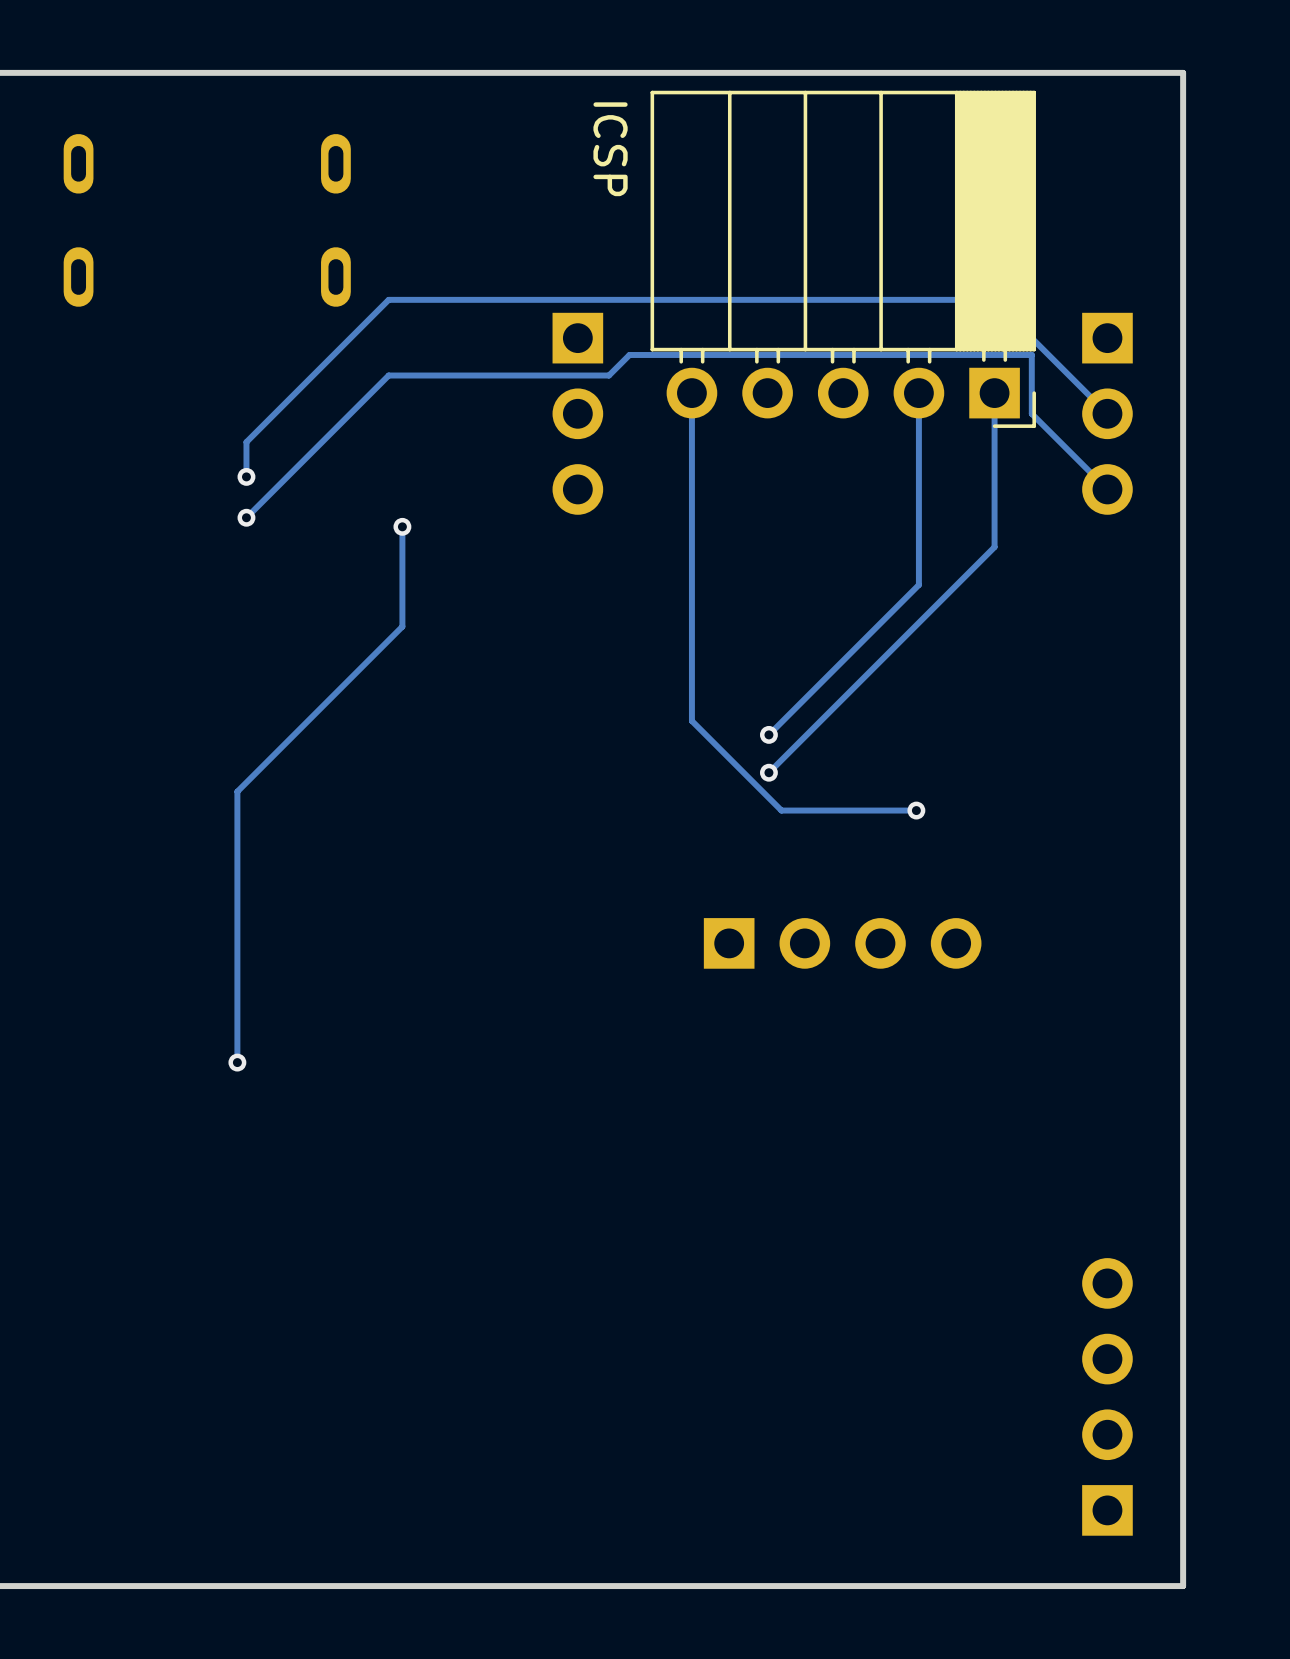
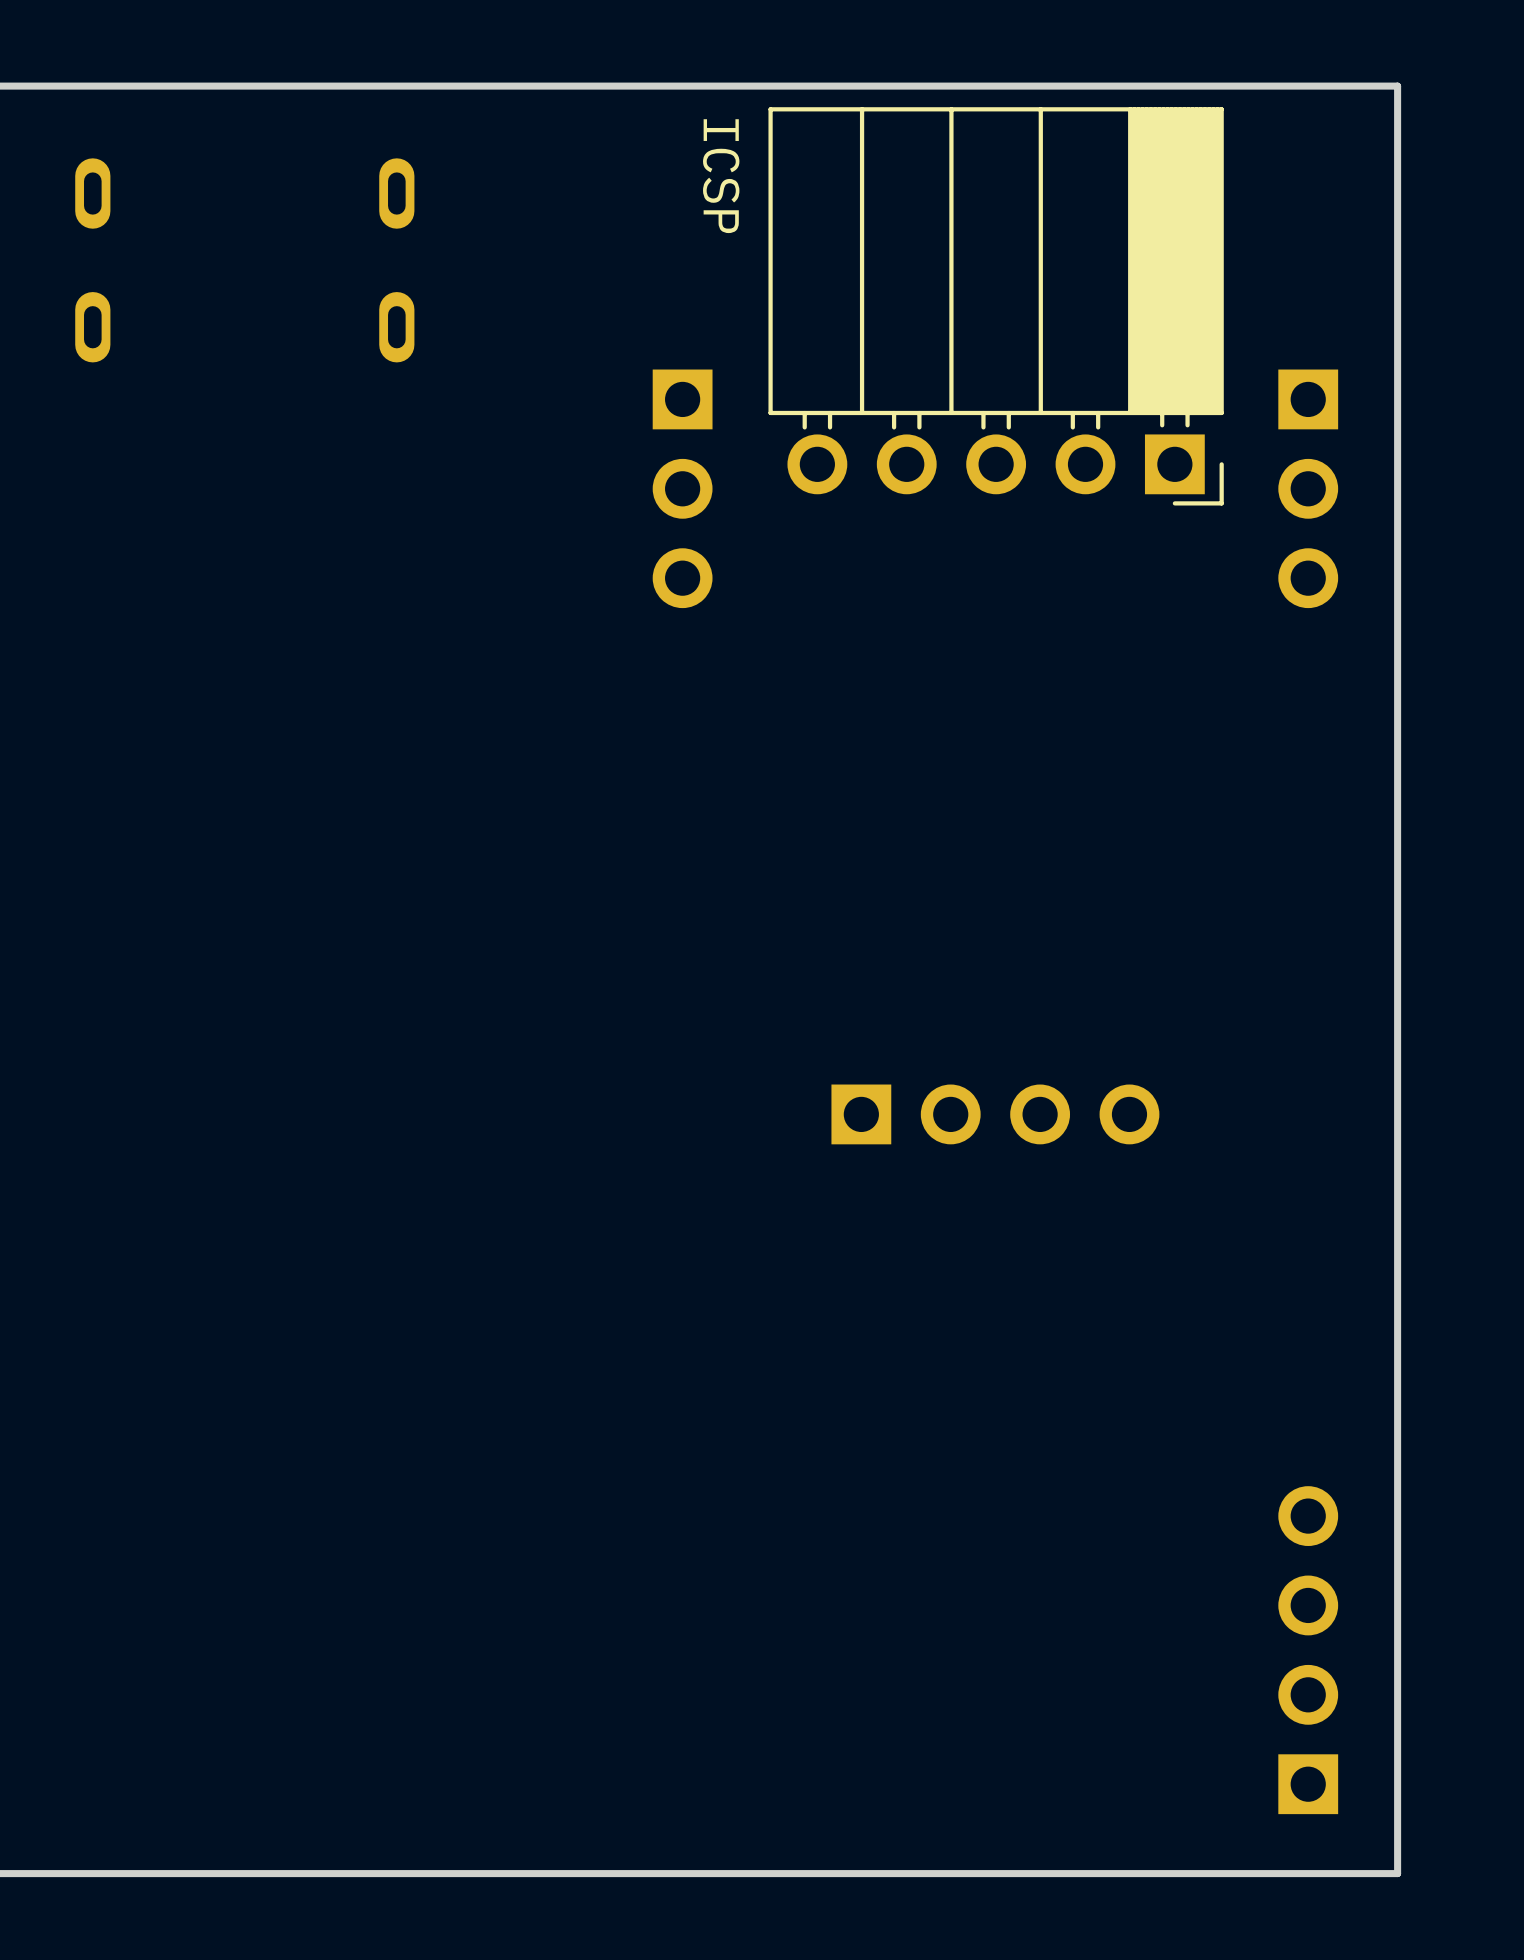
track: (691, 393) (691, 721) (781, 810) (916, 810) -> none
track: (918, 393) (918, 584) (768, 734) -> none
track: (994, 393) (994, 547) (768, 772) -> none
track: (1107, 413) (993, 299) (388, 299) (246, 442) (246, 476) -> none
via: (246, 476) -> none
track: (1107, 489) (1031, 413) (1031, 354) (629, 354) (608, 375) (388, 375) (246, 517) -> none
via: (246, 517) -> none
track: (402, 526) (402, 626) (237, 791) (237, 1062) -> none
via: (402, 526) -> none
via: (768, 734) -> none
via: (768, 772) -> none
via: (916, 810) -> none
via: (237, 1062) -> none

